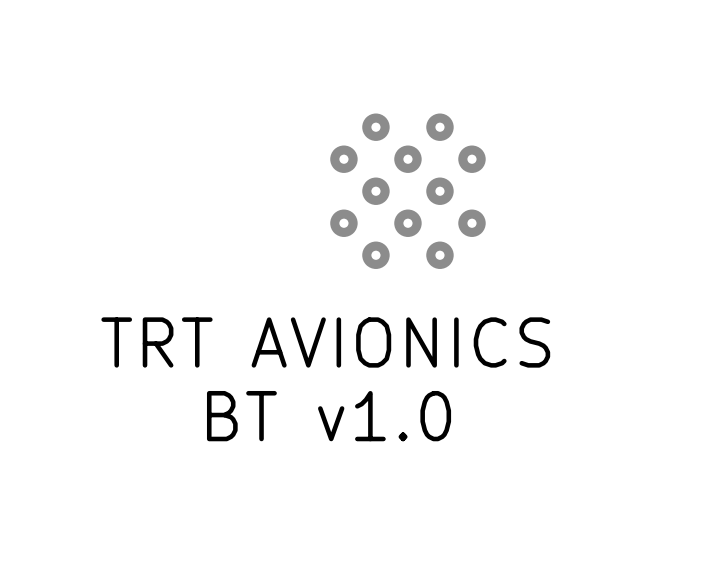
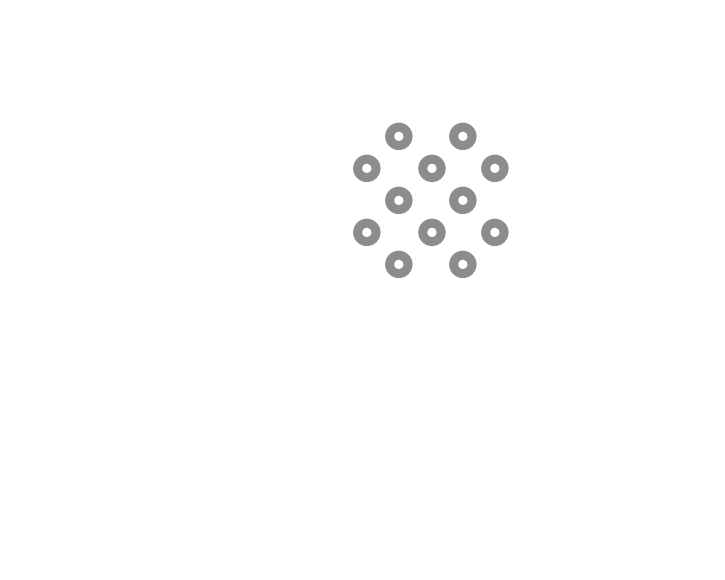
part footprint: [330, 113, 486, 269] -> [353, 122, 509, 279]
text: TRT AVIONICS (325, 342) -> none
text: BT v1.0 (329, 416) -> none

